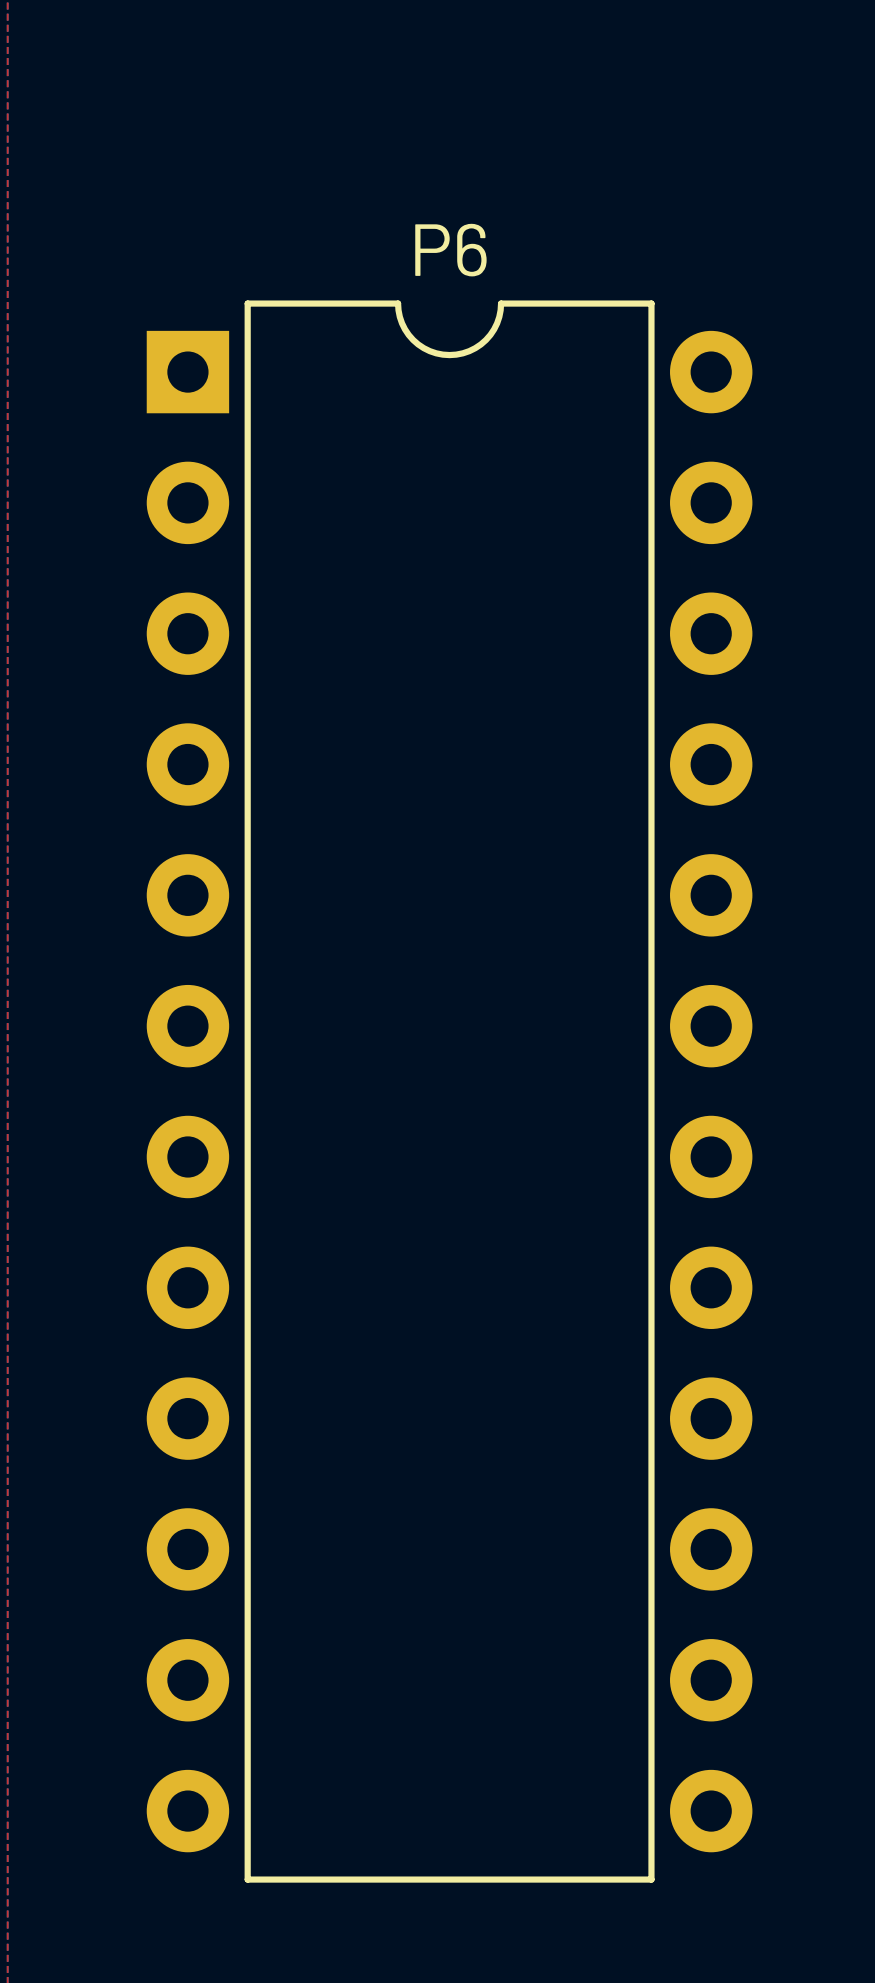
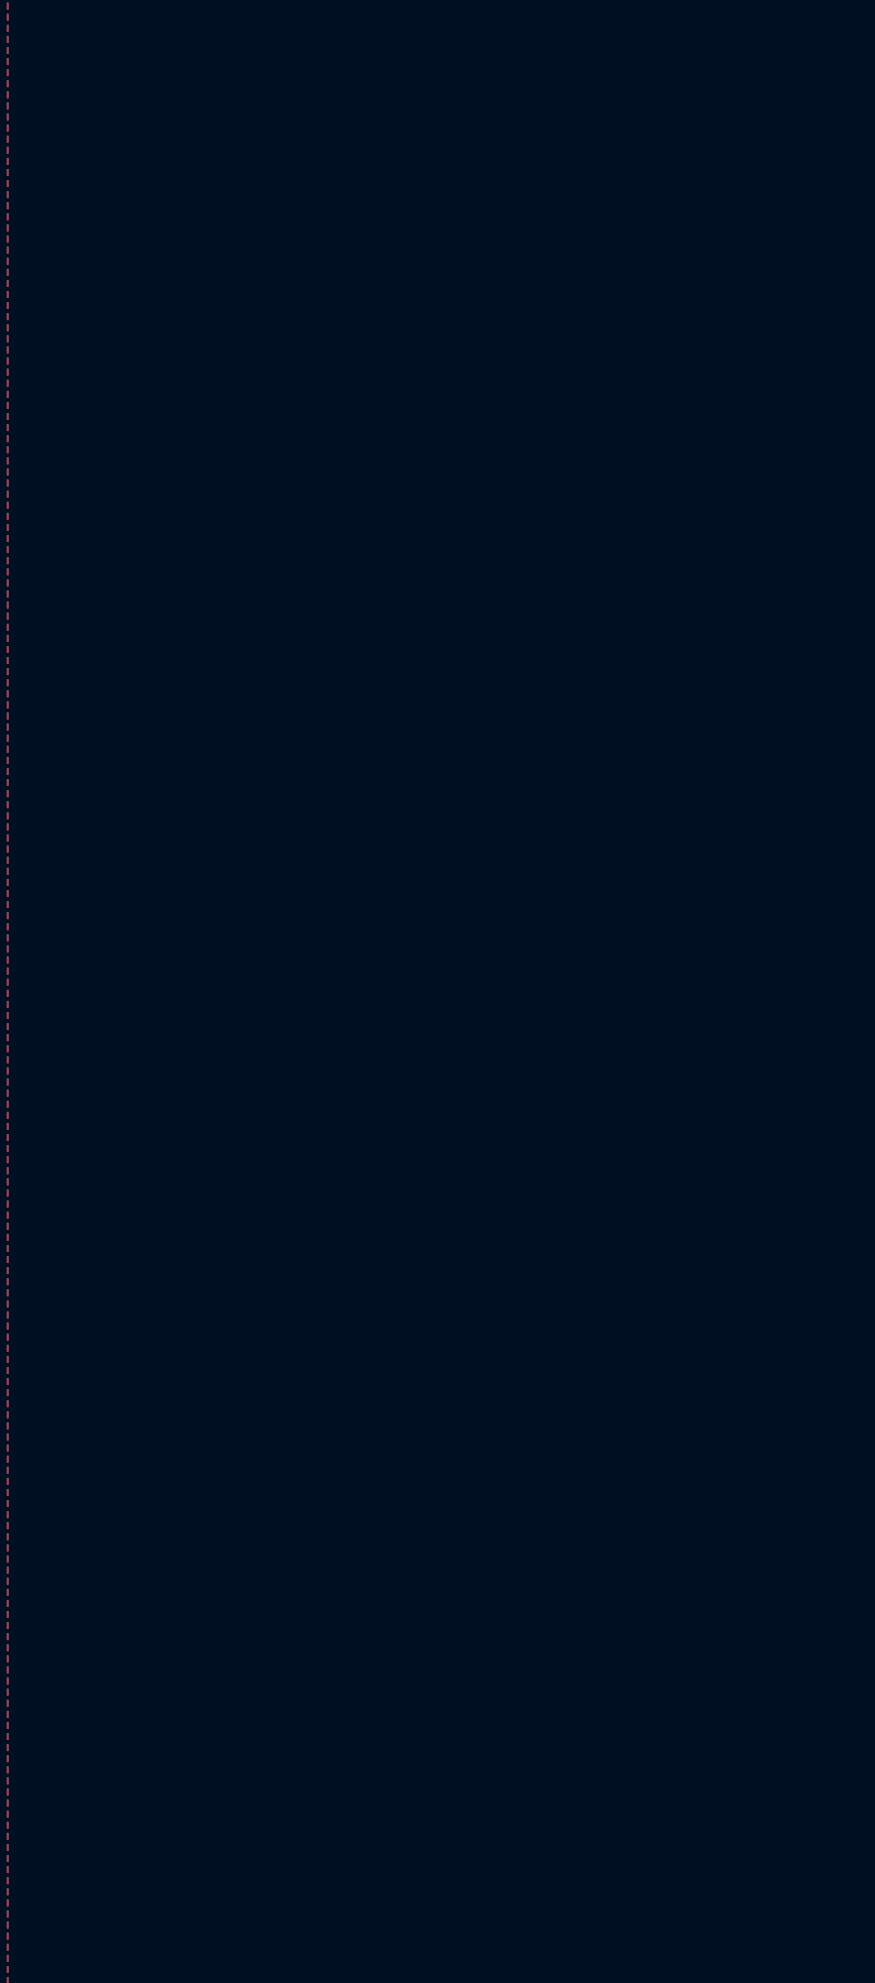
P6: (449, 1091) -> none

